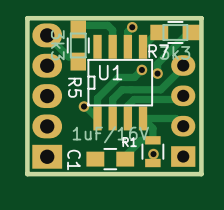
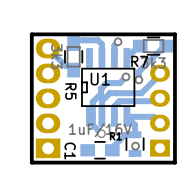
track: (112, 83) (97, 98) (97, 118) (84, 106) -> (101, 88) (101, 93) (92, 101) (92, 125) (101, 133)
via: (84, 106) -> none
via: none -> (101, 133)

